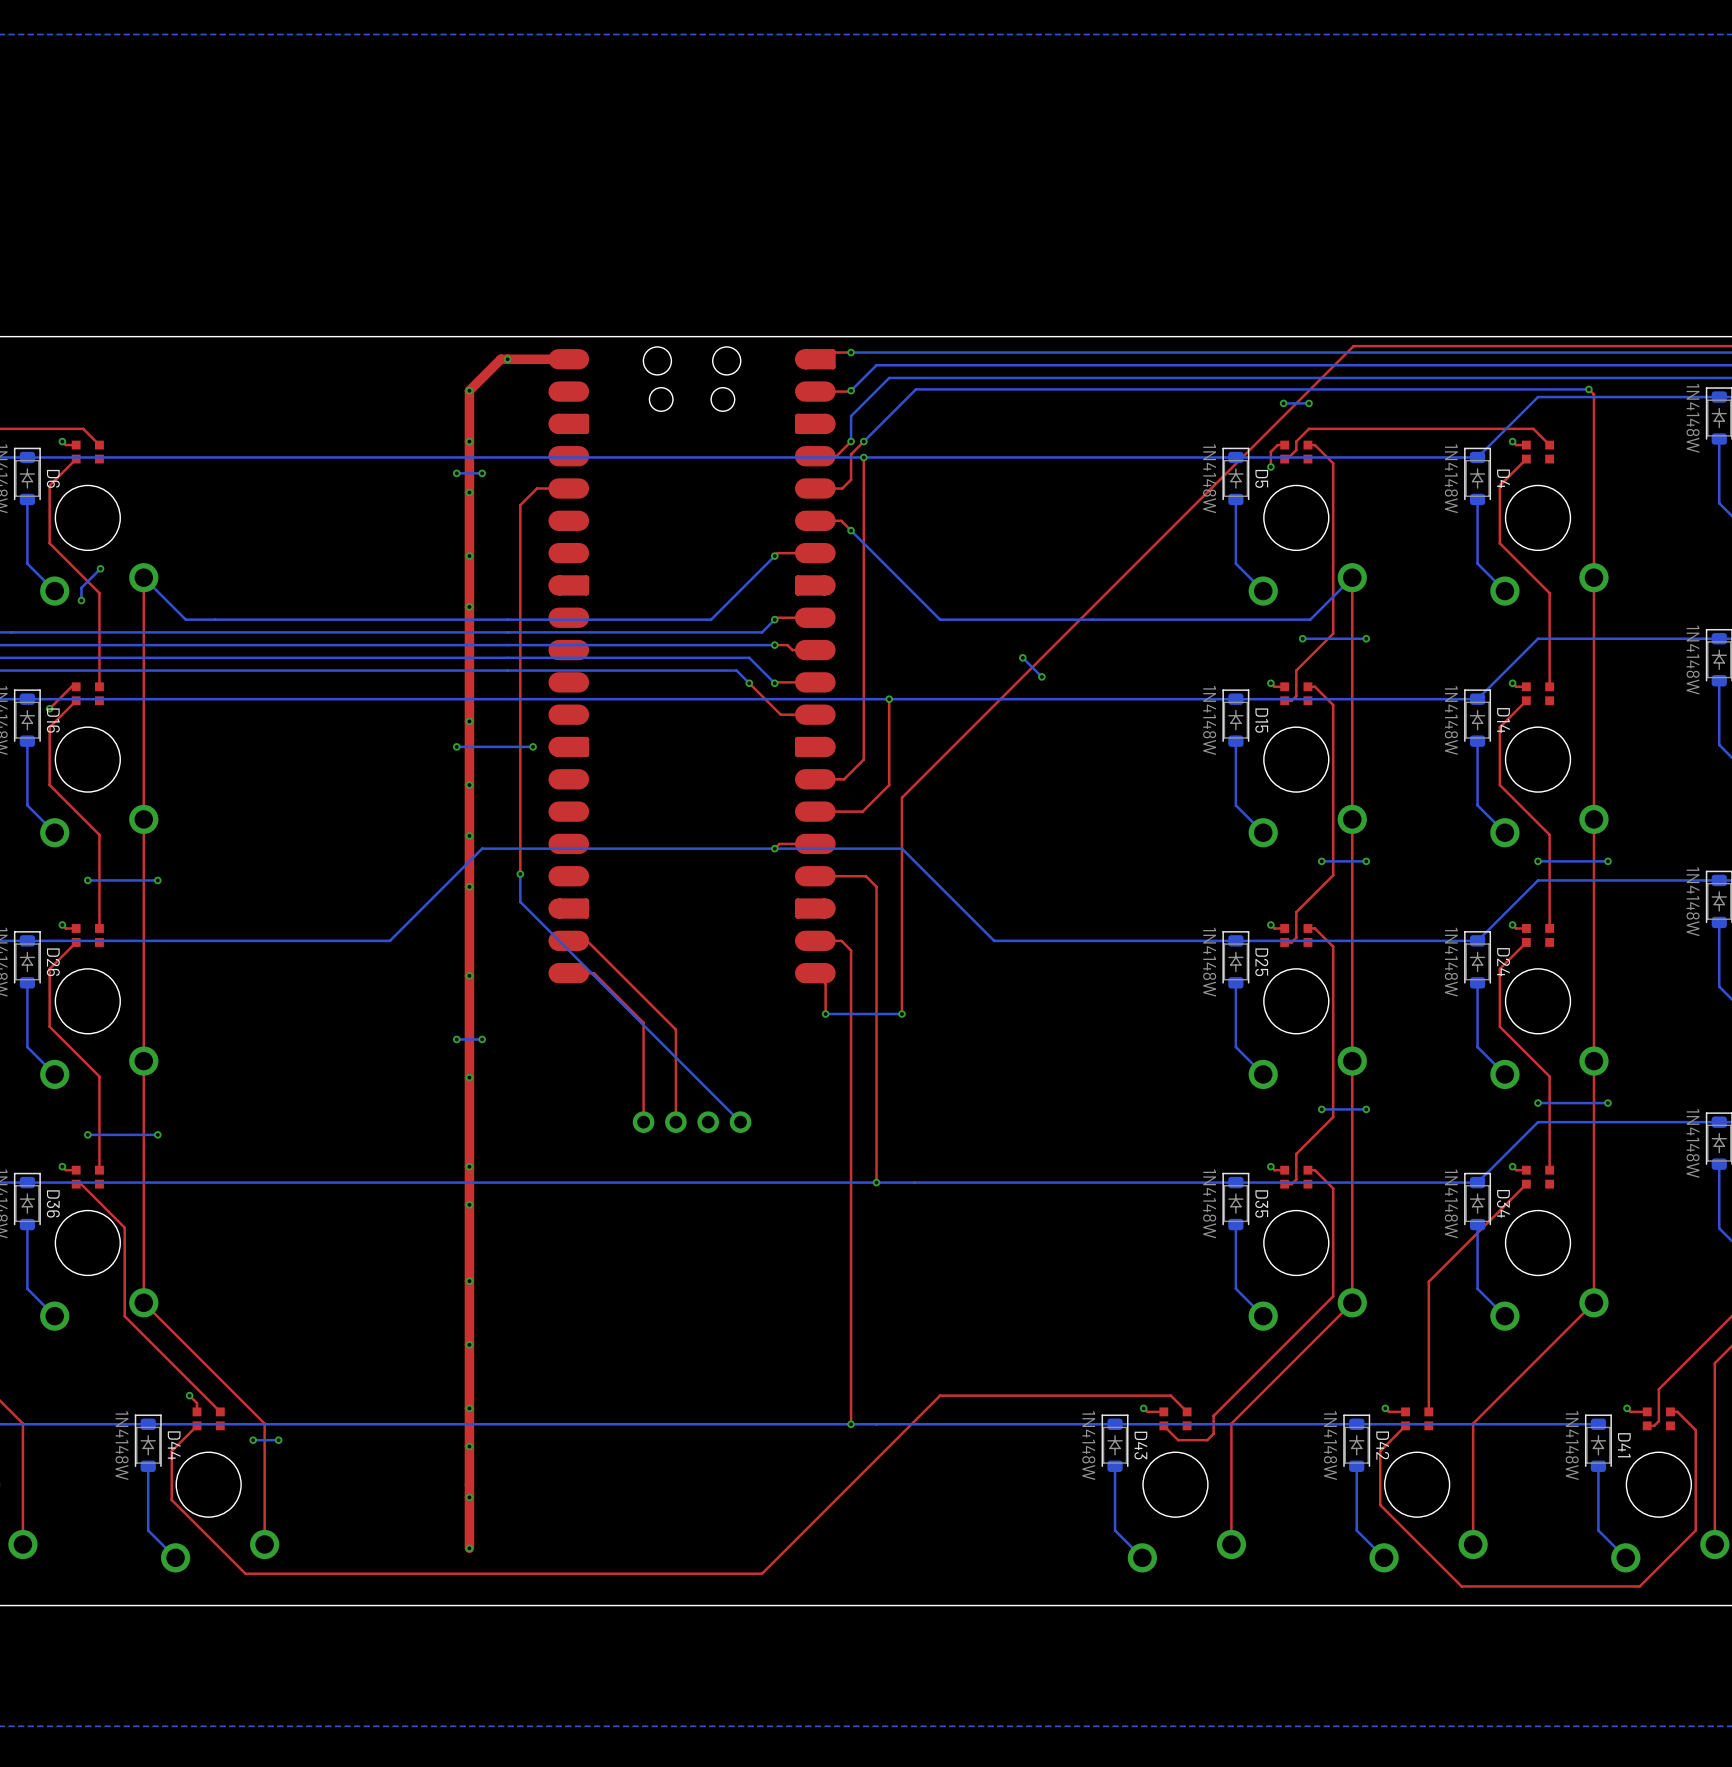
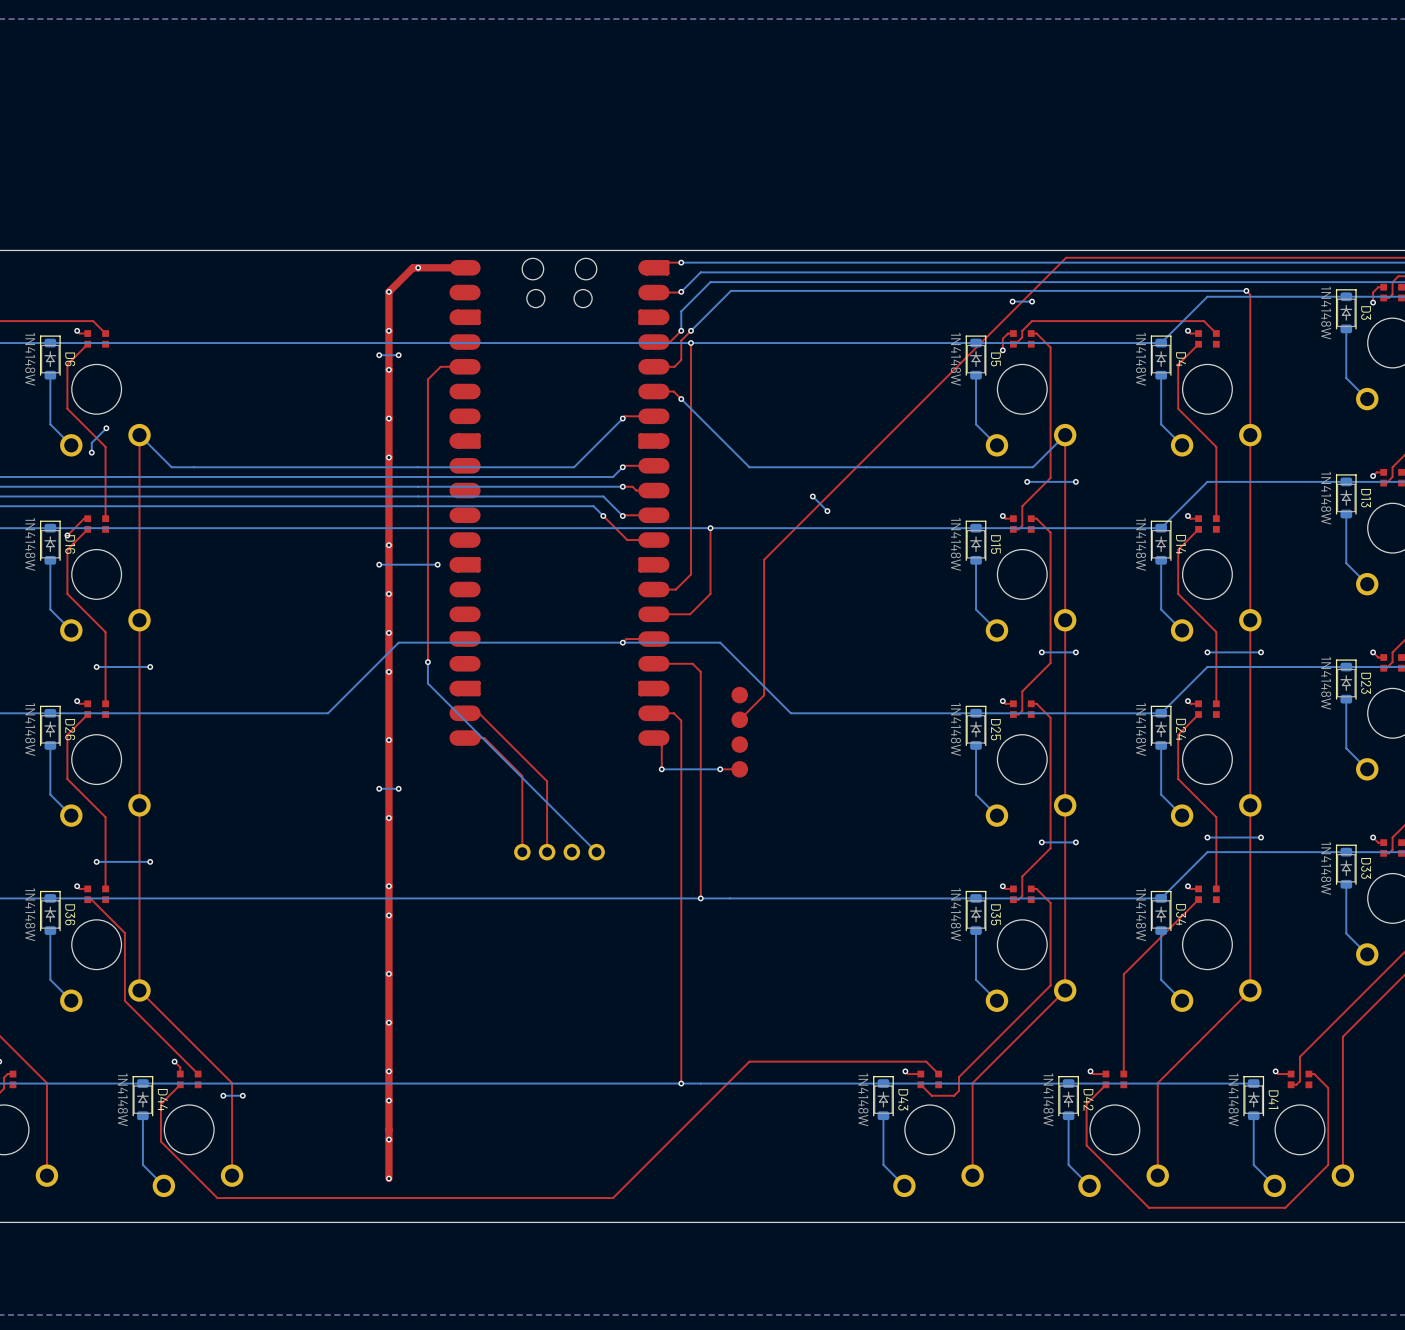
top track: (959, 740) (901, 797) (901, 1014) -> (764, 559) (764, 695) (739, 719)
part: none -> (739, 732)
top track: none -> (739, 769) (720, 769)

